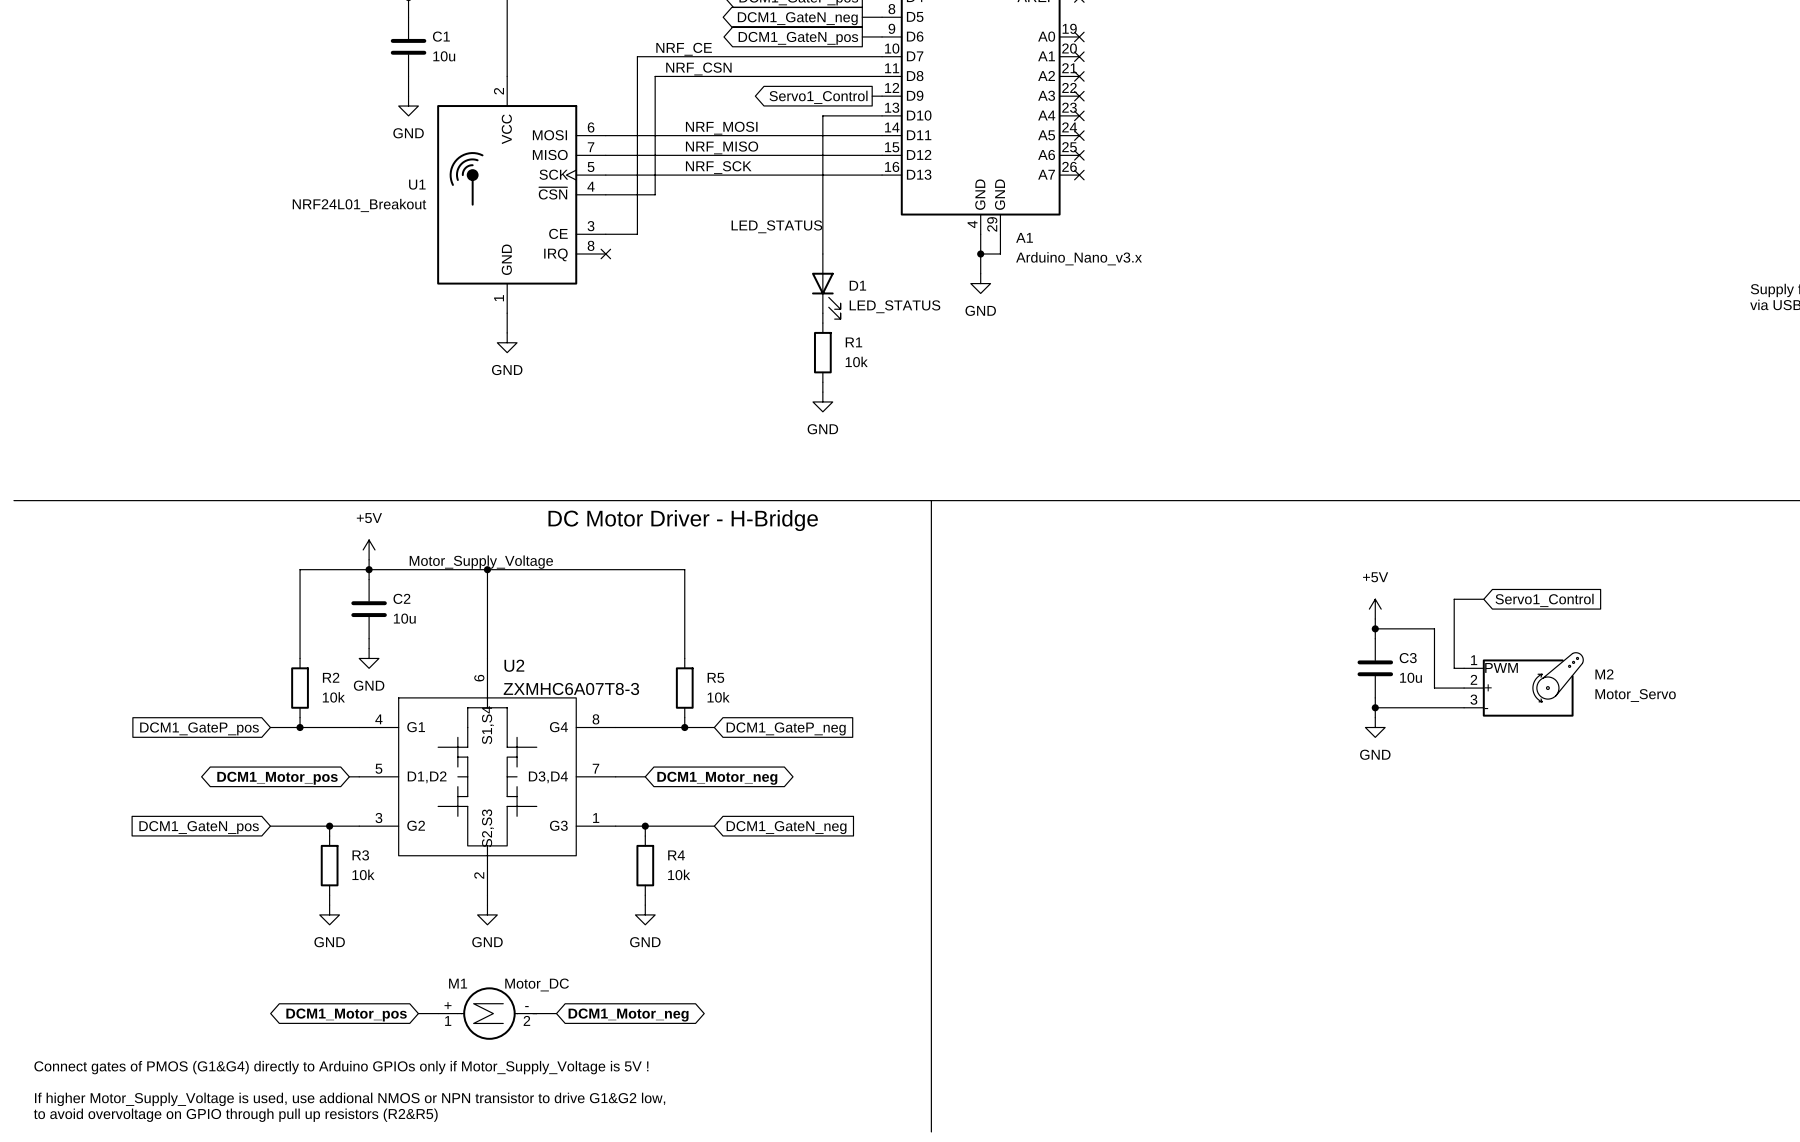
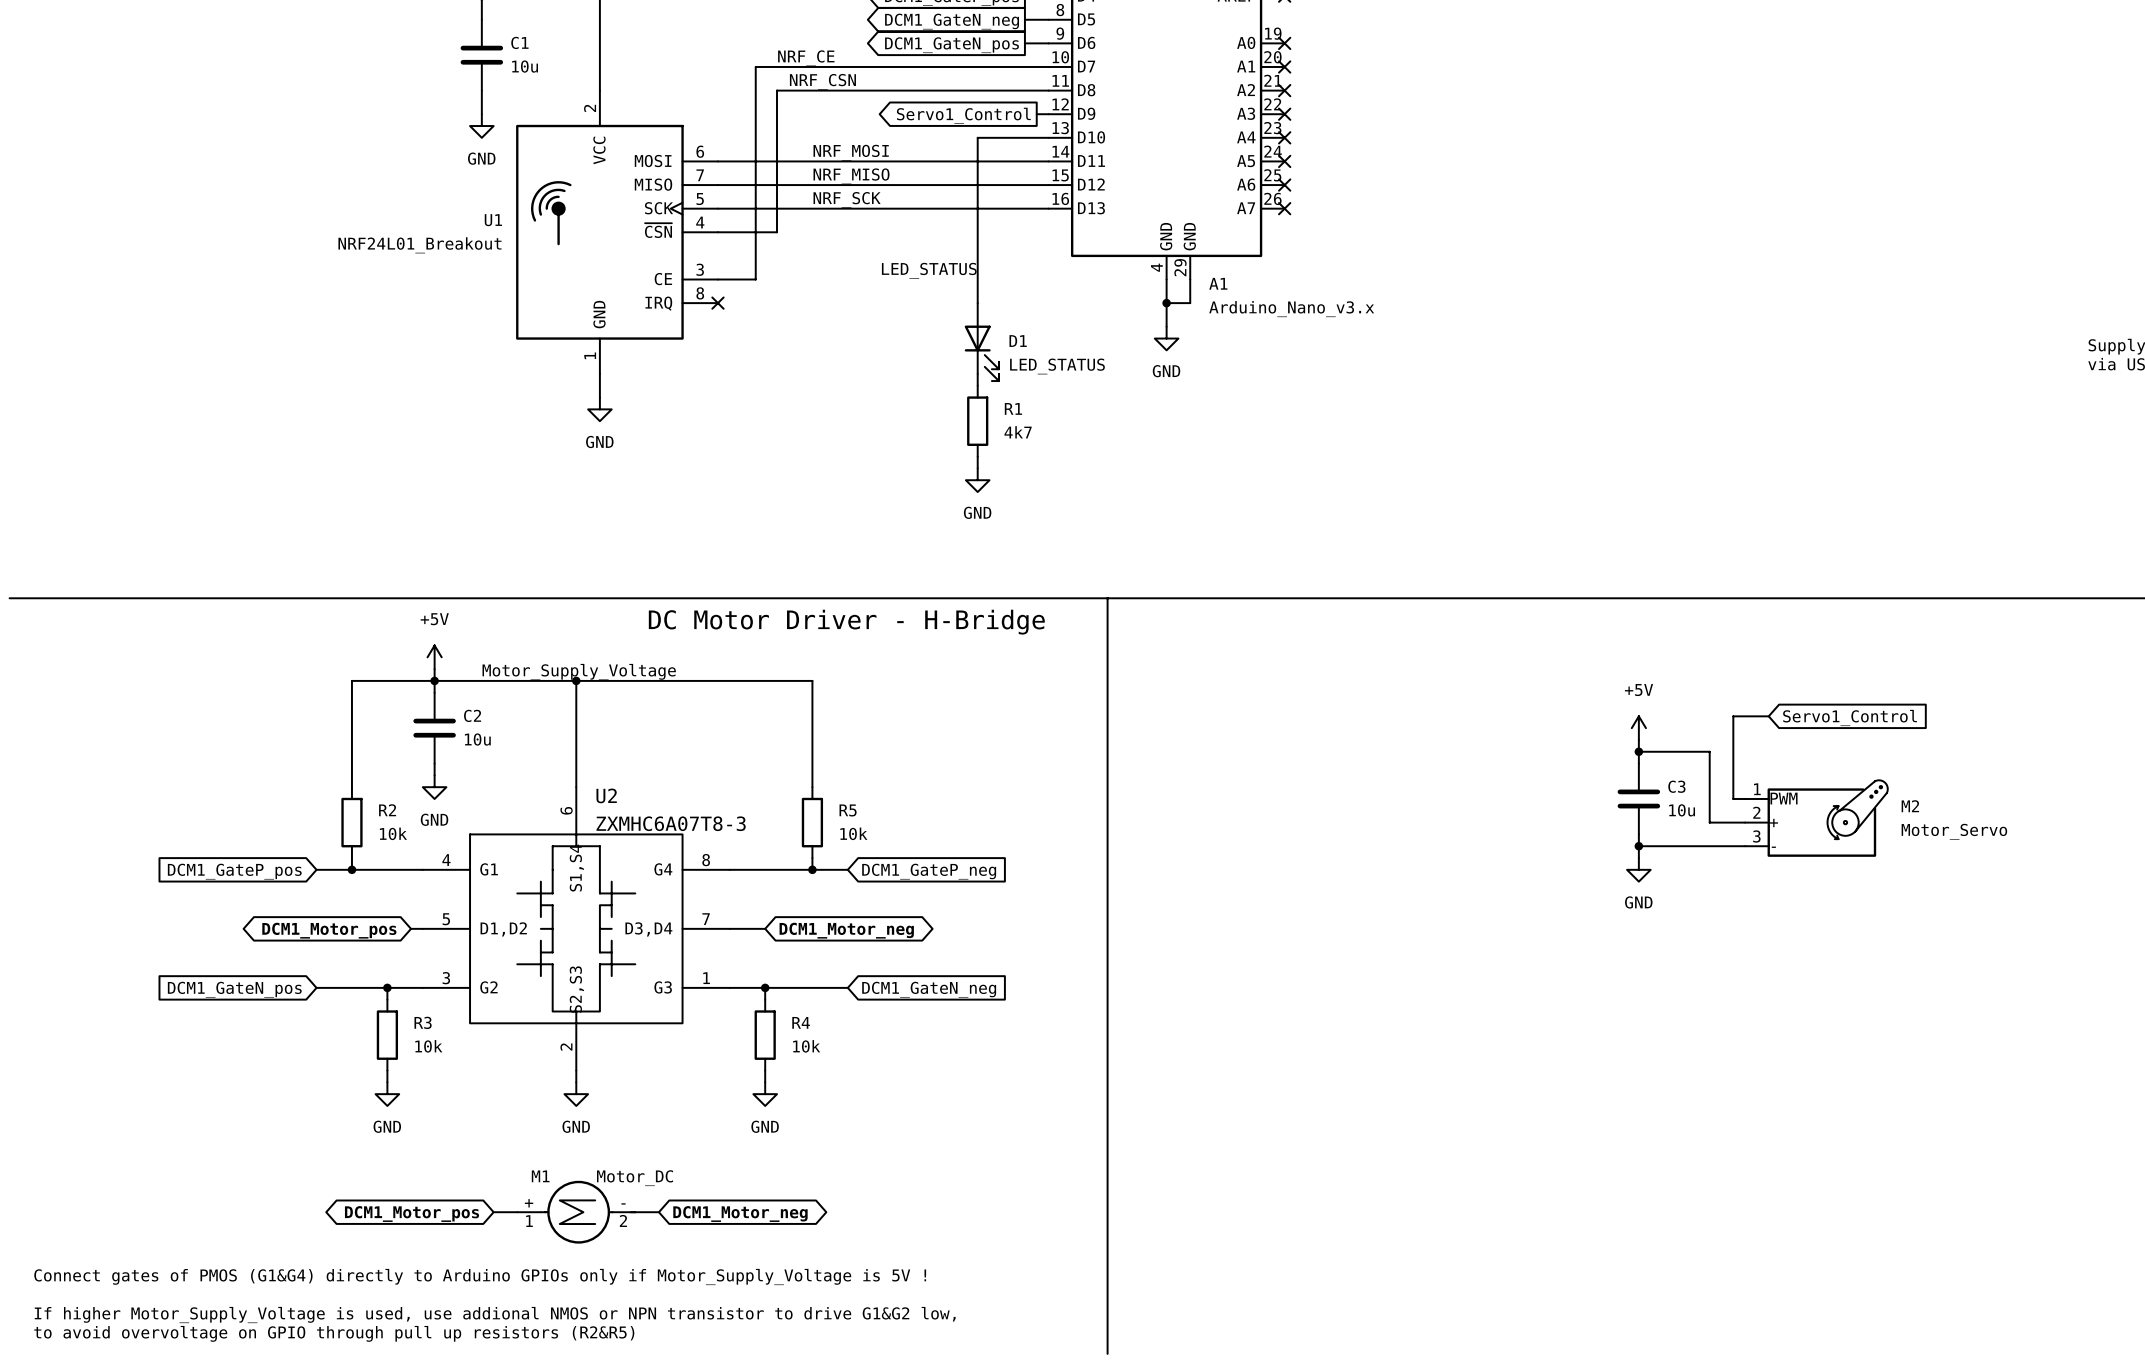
R1 value: 10k (856, 361) -> 4k7 (1018, 432)

